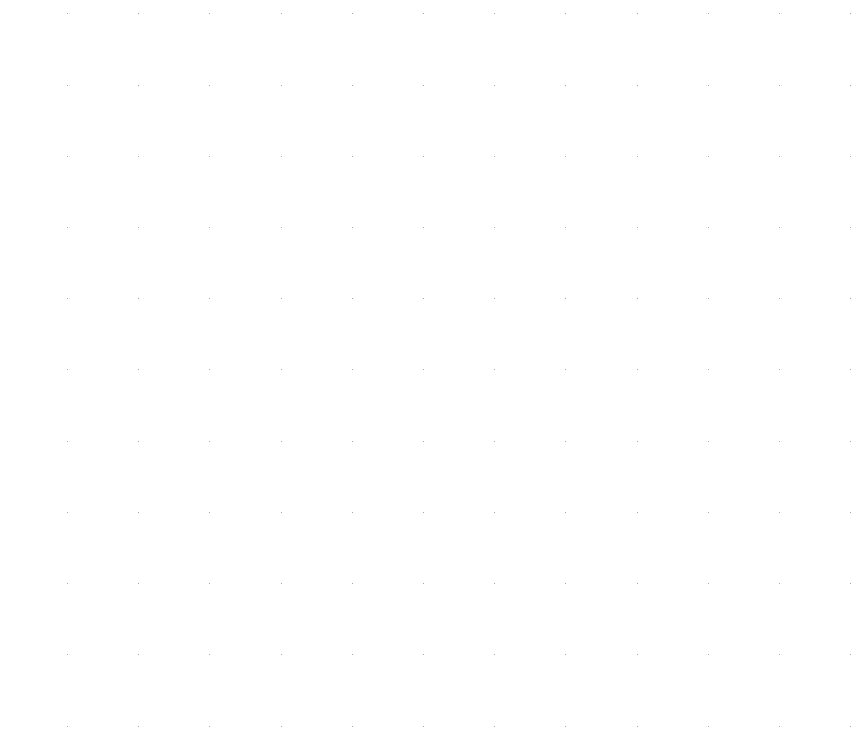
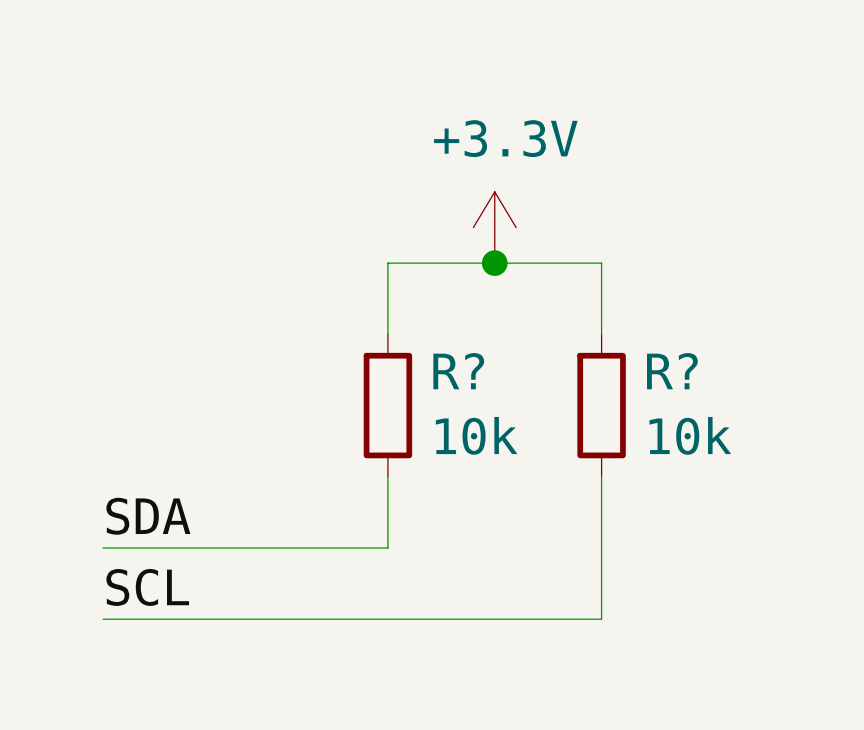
power symbol: none -> +3.3V (494, 227)
junction: none -> (494, 263)
wire: none -> (387, 334) (387, 263) (601, 263) (601, 334)
R?: none -> 10k (387, 405)
R?: none -> 10k (601, 405)
wire: none -> (387, 476) (387, 547) (103, 547)
wire: none -> (601, 476) (601, 619) (103, 619)
label: none -> SDA (148, 516)
label: none -> SCL (147, 587)

